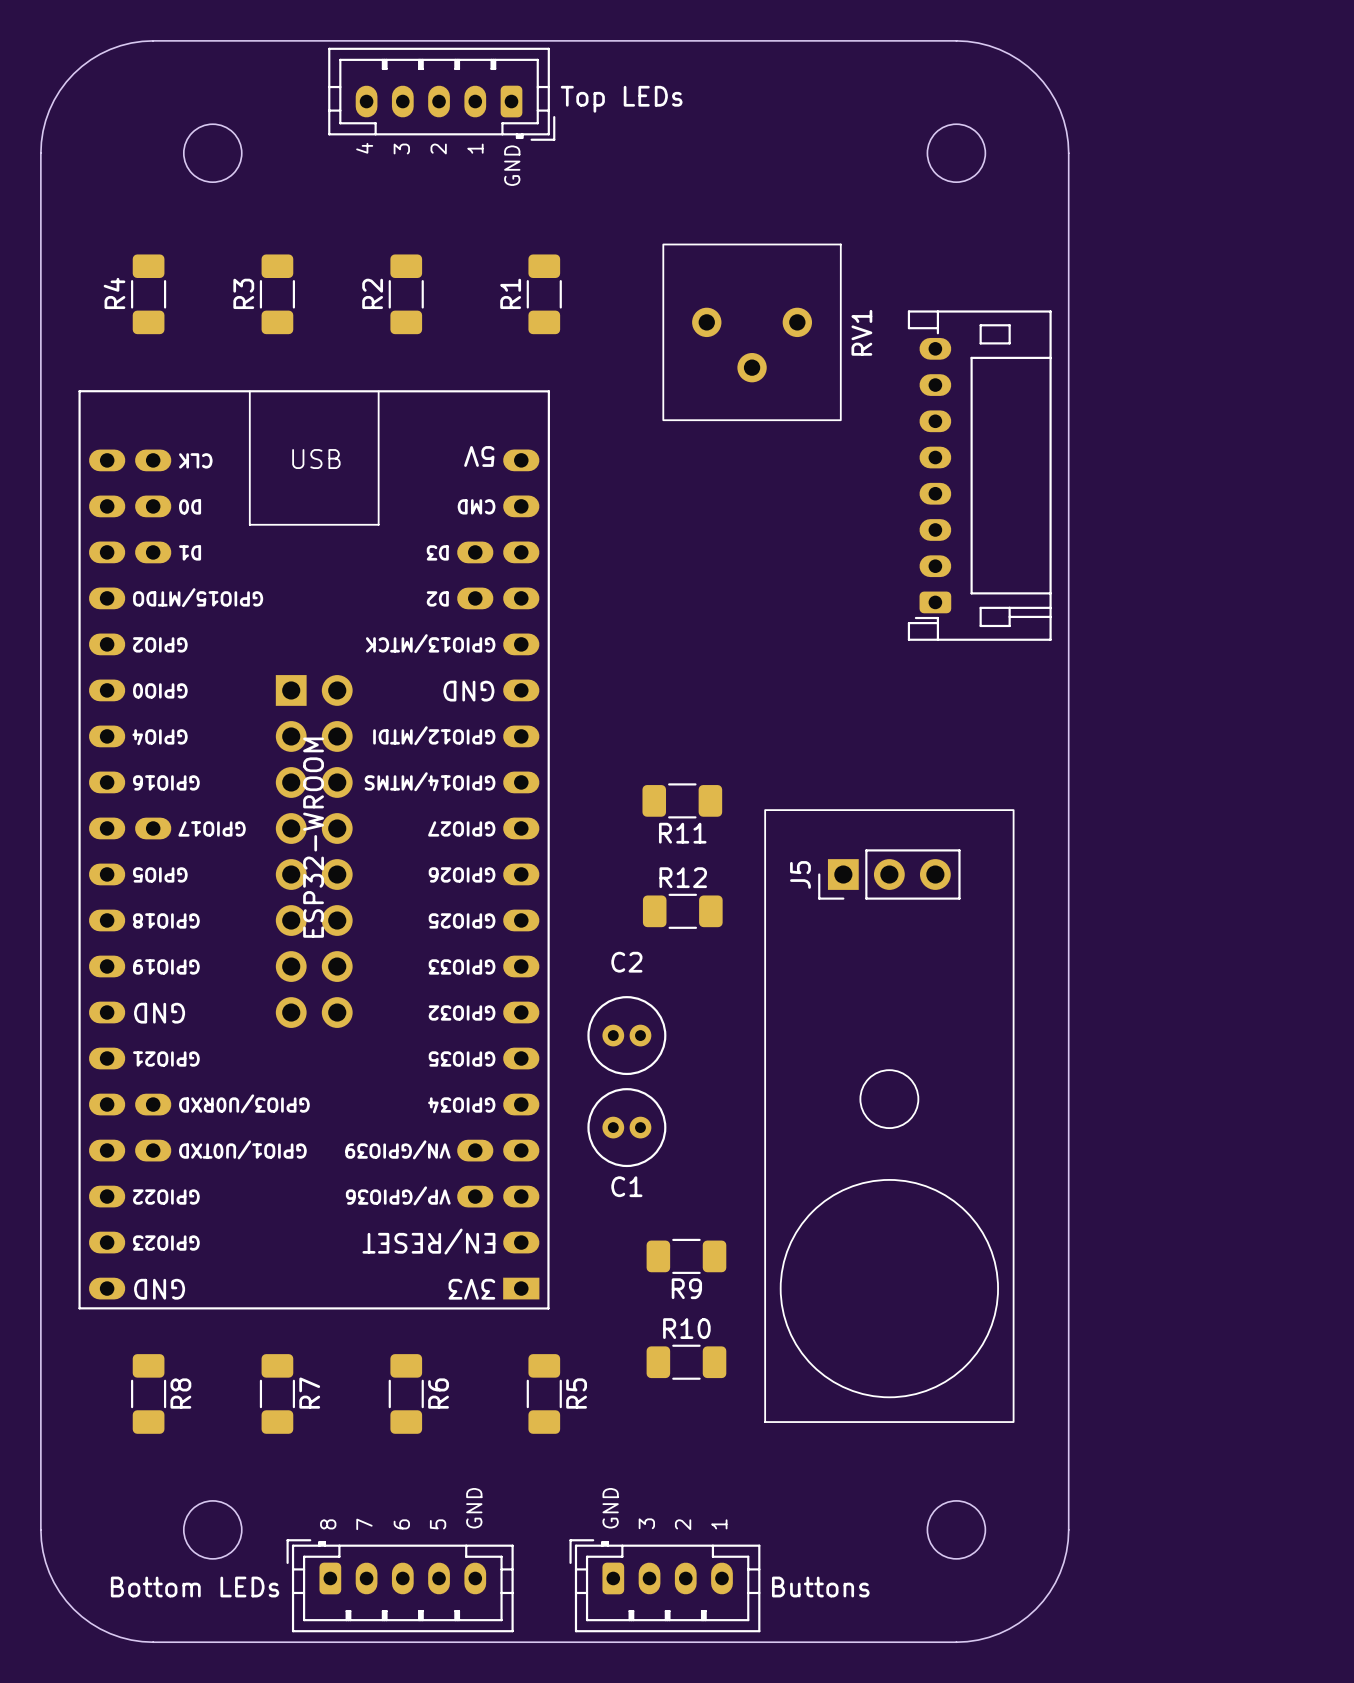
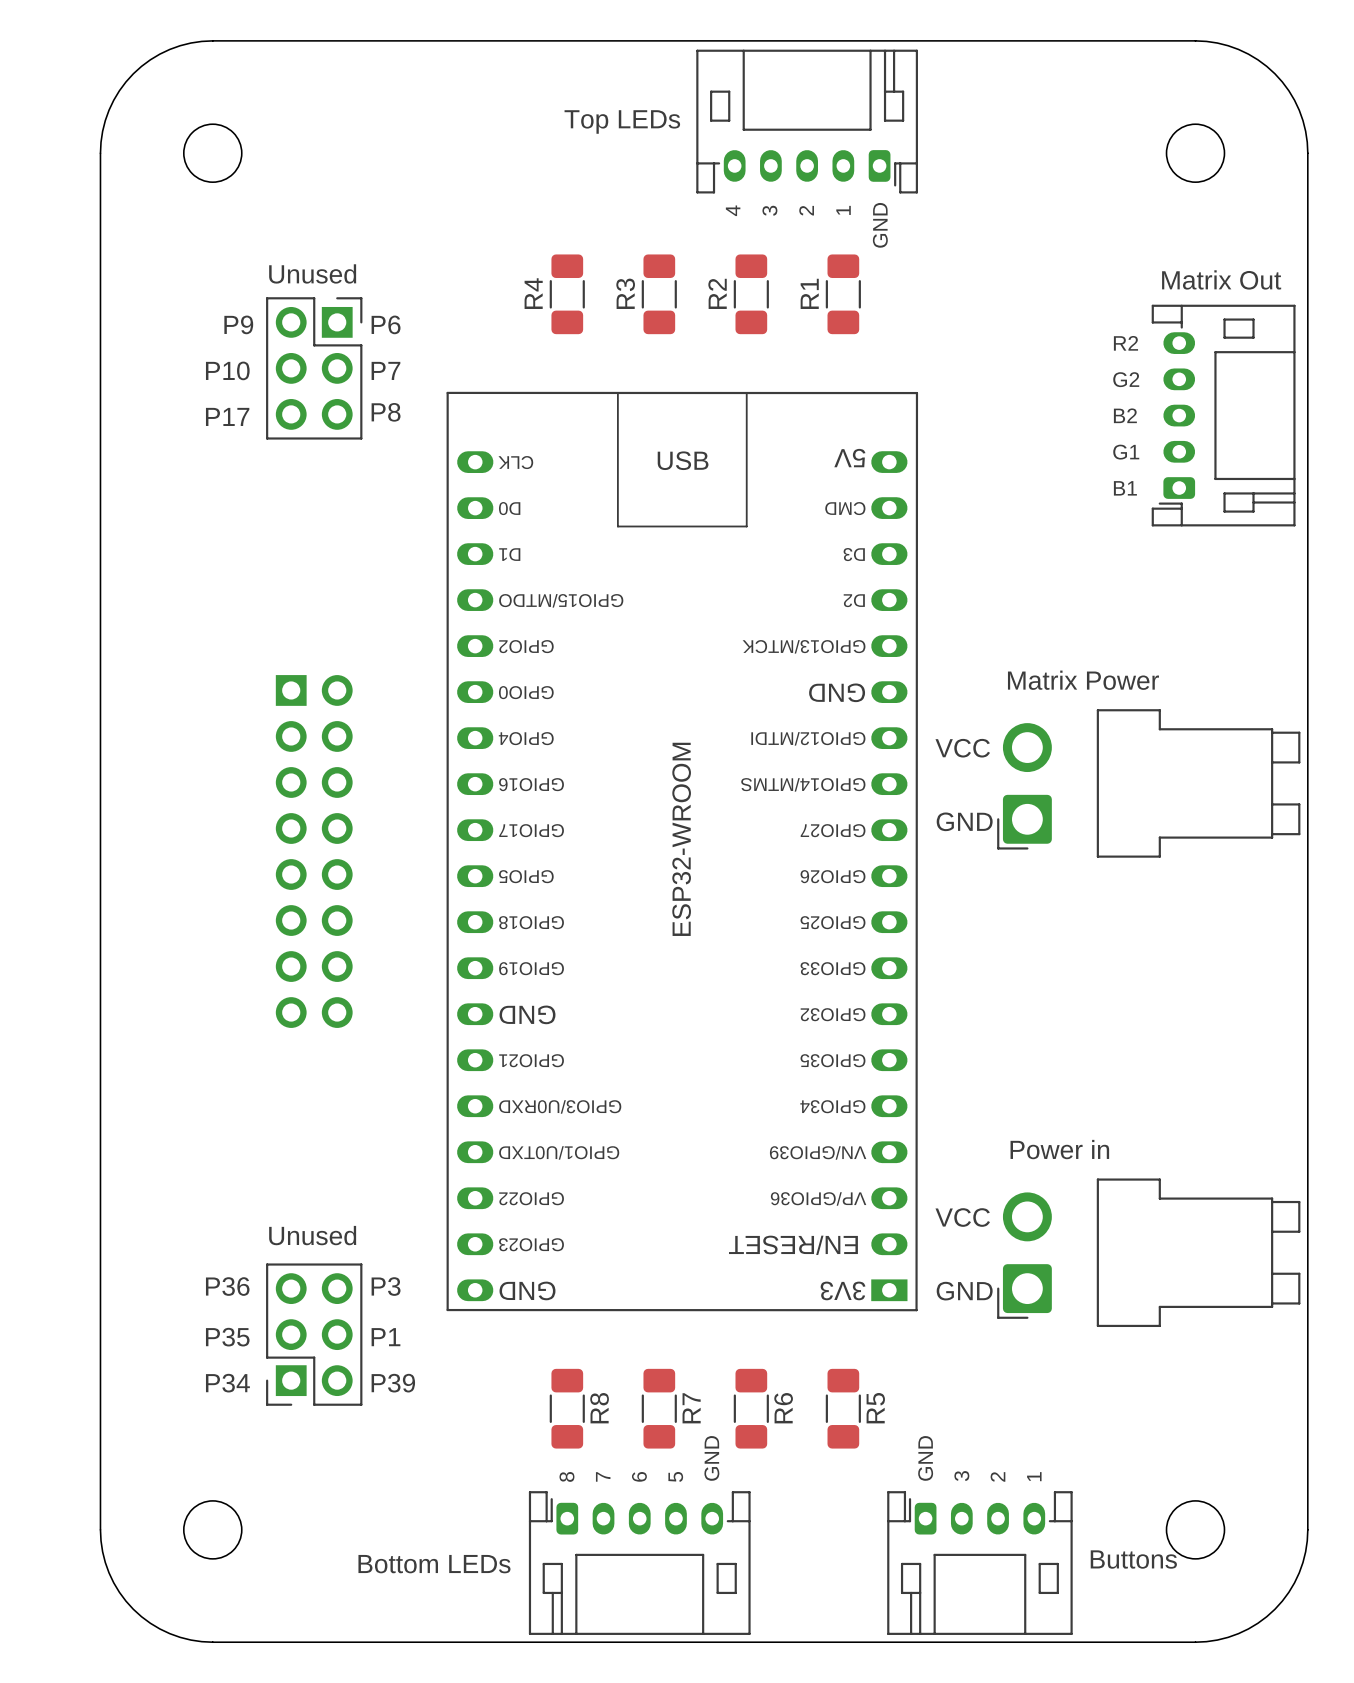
board edge: (212, 40) (153, 40) (131, 43) (110, 49) (90, 59) (73, 73) (54, 100) (45, 120) (40, 153) (41, 1540) (49, 1572) (59, 1592) (73, 1609) (100, 1628) (120, 1637) (142, 1641) (212, 1642) -> (212, 40) (190, 43) (169, 49) (150, 59) (133, 73) (119, 90) (109, 110) (102, 131) (100, 153) (101, 1540) (105, 1562) (113, 1582) (125, 1601) (141, 1616) (159, 1628) (180, 1637) (212, 1642)
board edge: (956, 40) (978, 43) (999, 49) (1027, 66) (1043, 81) (1055, 100) (1063, 120) (1068, 142) (1068, 1529) (1066, 1551) (1060, 1572) (1049, 1592) (1035, 1609) (1018, 1623) (999, 1633) (978, 1640) (956, 1642) -> (956, 40) (1195, 40) (1228, 45) (1248, 54) (1266, 66) (1288, 90) (1302, 120) (1307, 153) (1307, 1529) (1305, 1551) (1294, 1582) (1274, 1609) (1248, 1628) (1228, 1637) (1195, 1642) (956, 1642)
part: Top LEDs (441, 94) -> none
part: none -> Top LEDs (807, 121)
text position: 4 (364, 148) -> 4 (733, 210)
text position: 3 (401, 148) -> 3 (769, 210)
text position: 2 (438, 148) -> 2 (806, 210)
text position: 1 (475, 148) -> 1 (843, 210)
round board edge position: (956, 153) -> (1195, 153)
text position: GND (512, 165) -> GND (880, 225)
text: none -> Unused (312, 273)
R4 position: (148, 294) -> (567, 294)
R3 position: (277, 294) -> (659, 294)
R2 position: (406, 294) -> (751, 294)
R1 position: (544, 294) -> (843, 294)
text: none -> P9 (238, 324)
text: none -> P6 (386, 324)
RV1: (752, 332) -> none
text: none -> R2 (1125, 343)
part: none -> (314, 368)
text: none -> P10 (227, 370)
text: none -> P7 (385, 370)
text: none -> G2 (1126, 379)
text: none -> P8 (386, 412)
text: none -> B2 (1125, 415)
part: none -> Matrix Out (1223, 415)
text: none -> P17 (227, 416)
text: none -> G1 (1126, 452)
part: (153, 460) -> none
part: (979, 475) -> none
text: none -> B1 (1125, 488)
part: (153, 506) -> none
part: (153, 552) -> none
part: (475, 552) -> none
part: (475, 598) -> none
text: none -> VCC (962, 748)
part: none -> Matrix Power (1148, 783)
R11: (682, 800) -> none
text: none -> GND (964, 821)
part: (153, 828) -> none
part: ESP32-WROOM (314, 849) -> none
part: none -> ESP32-WROOM (682, 851)
R12: (682, 911) -> none
C2: (626, 1035) -> none
part: (153, 1104) -> none
J5: (889, 1116) -> none
C1: (626, 1127) -> none
part: (153, 1150) -> none
part: (475, 1150) -> none
part: (475, 1196) -> none
text: none -> VCC (962, 1217)
text: none -> Unused (312, 1235)
part: none -> Power in (1148, 1252)
R9: (686, 1256) -> none
text: none -> P36 (227, 1286)
text: none -> P3 (386, 1286)
text: none -> GND (964, 1291)
part: none -> (314, 1334)
text: none -> P35 (227, 1337)
text: none -> P1 (385, 1337)
R10: (686, 1362) -> none
text: none -> P34 (227, 1383)
text: none -> P39 (393, 1383)
R8 position: (148, 1393) -> (567, 1408)
R7 position: (277, 1393) -> (659, 1408)
R6 position: (406, 1393) -> (751, 1408)
R5 position: (544, 1393) -> (843, 1408)
text: none -> GND (925, 1458)
text: GND (474, 1508) -> none
text position: GND (610, 1508) -> GND (711, 1458)
text position: 3 (646, 1523) -> 3 (961, 1476)
text position: 8 (328, 1524) -> 8 (566, 1476)
text position: 7 (364, 1524) -> 7 (603, 1476)
text position: 6 (401, 1524) -> 6 (639, 1476)
text position: 5 (438, 1524) -> 5 (675, 1476)
text position: 2 (683, 1524) -> 2 (997, 1476)
text position: 1 (719, 1524) -> 1 (1034, 1476)
round board edge position: (956, 1529) -> (1195, 1529)
part: none -> Bottom LEDs (639, 1563)
part: none -> Buttons (979, 1563)
part: Bottom LEDs (400, 1585) -> none
part: Buttons (664, 1585) -> none

